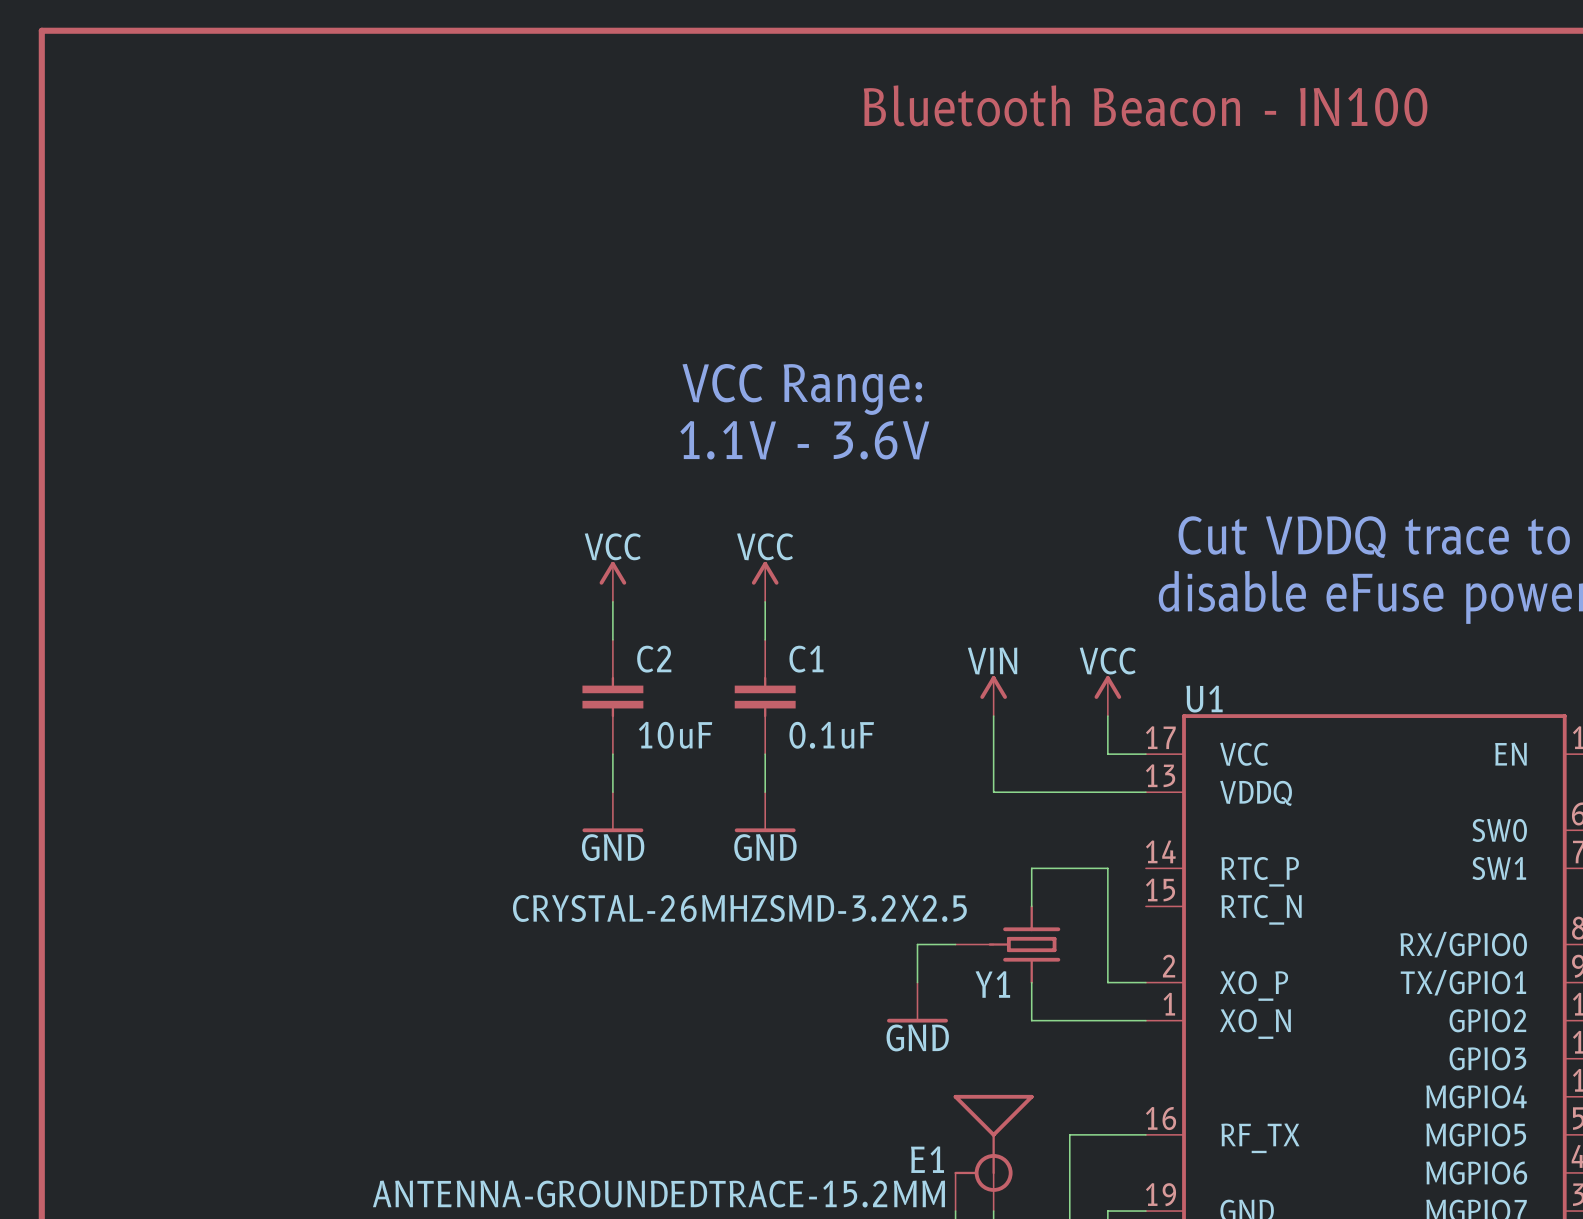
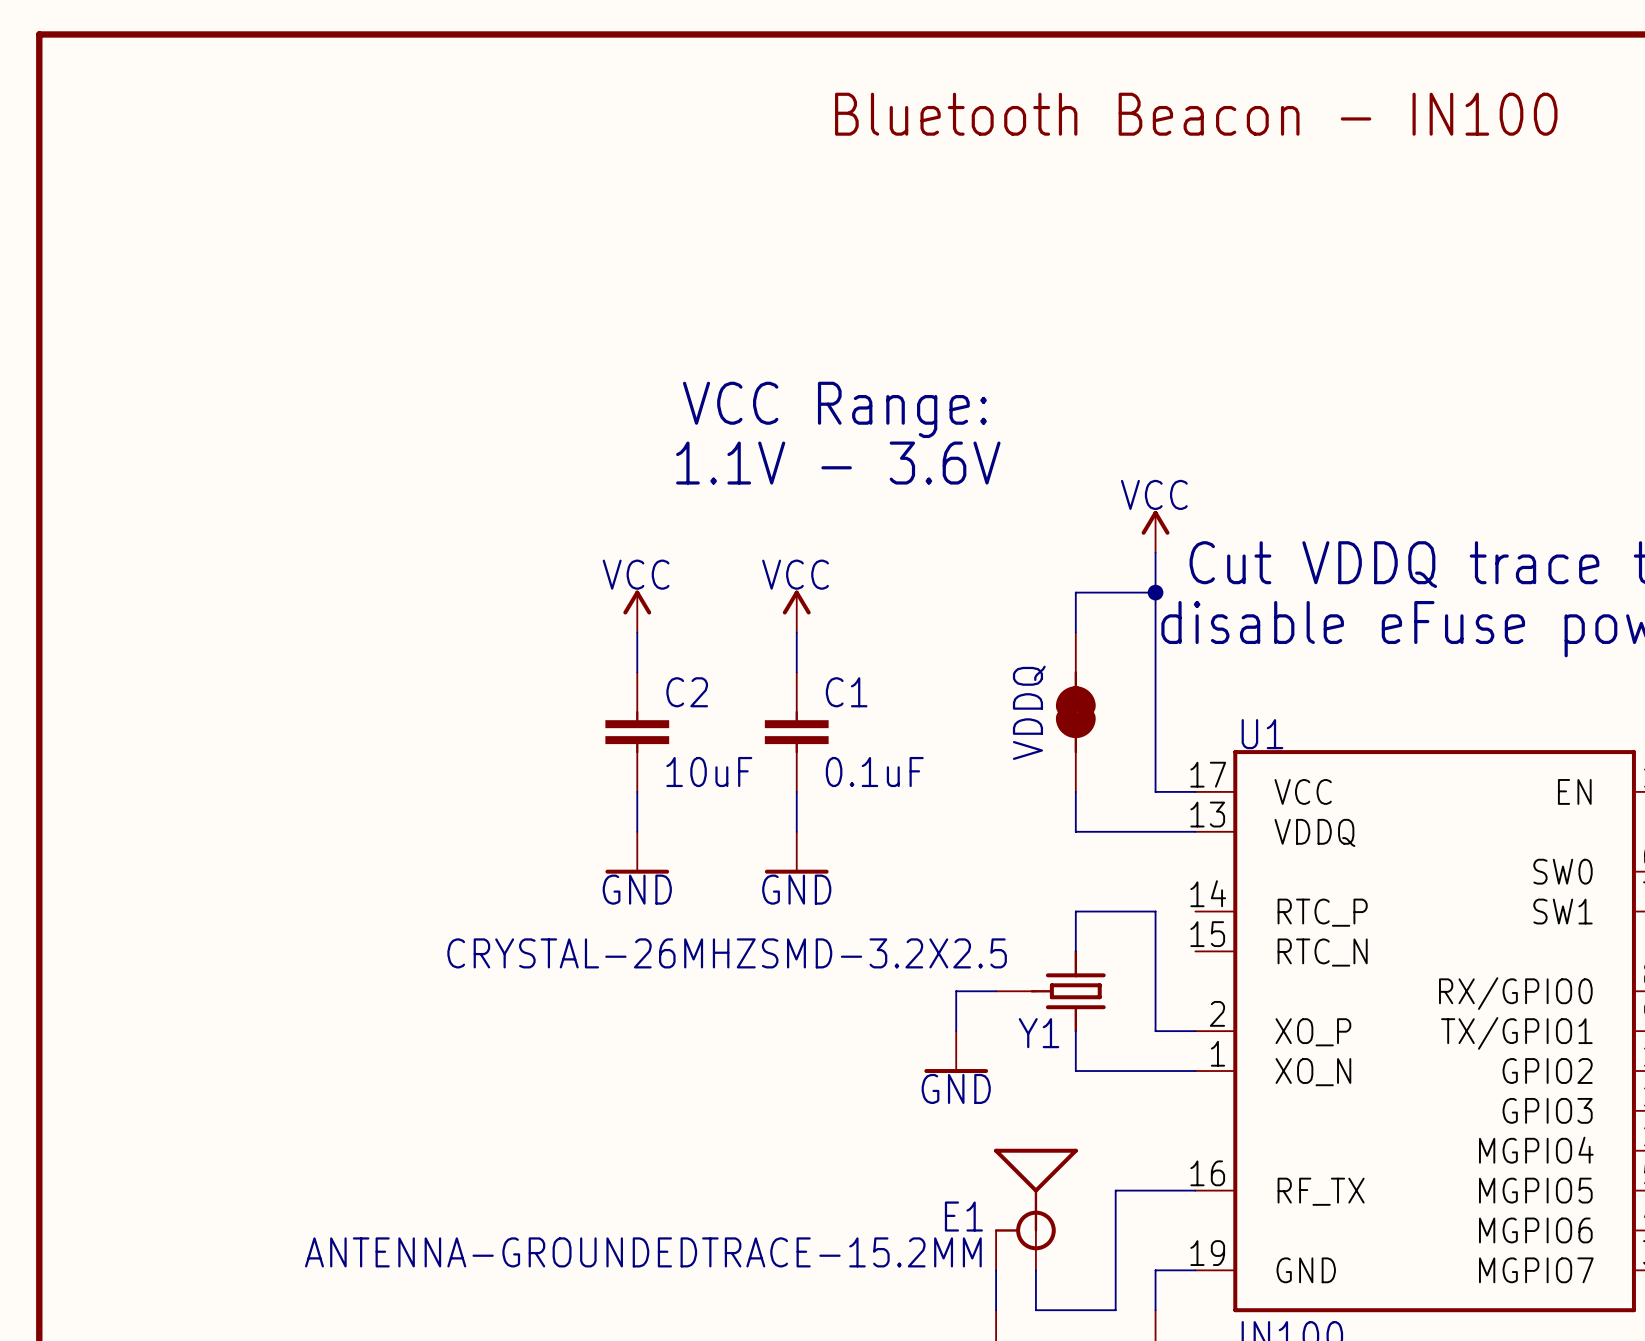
wire: none -> (1155, 552) (1155, 752)
wire: none -> (1155, 592) (1075, 592) (1075, 632)
junction: none -> (1155, 592)
VDDQ: none -> (1075, 712)
power symbol: VIN (993, 696) -> none
power symbol position: VCC (1107, 696) -> VCC (1155, 531)
wire: (993, 716) (993, 792) (1031, 792) -> (1075, 791) (1075, 831)

